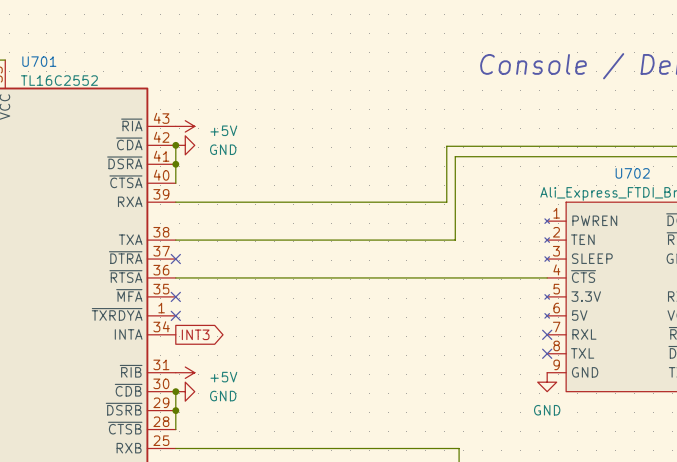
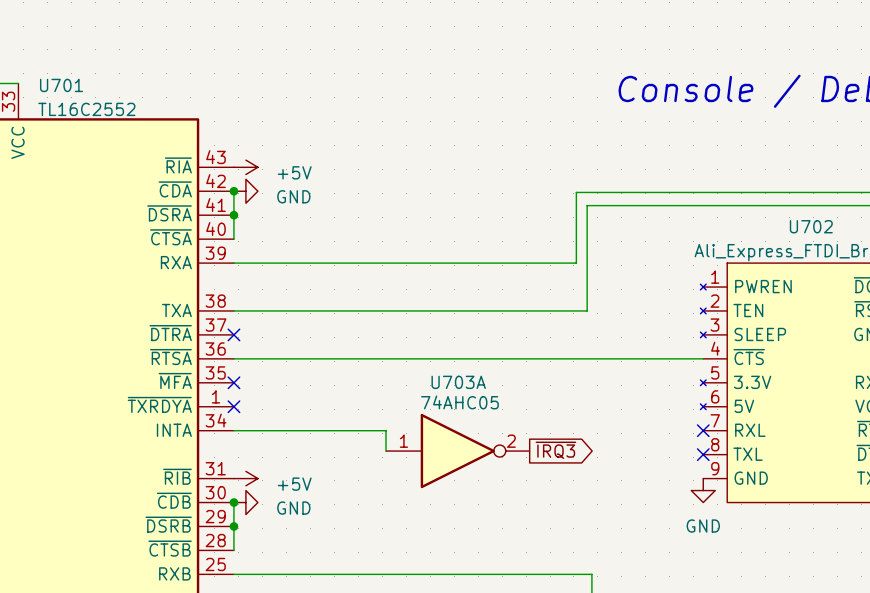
wire: none -> (233, 430) (386, 430) (386, 451)
global label: INT3 (195, 334) -> none
U703A: none -> 74AHC05 (457, 451)
global label: none -> ~{IRQ3} (555, 450)

